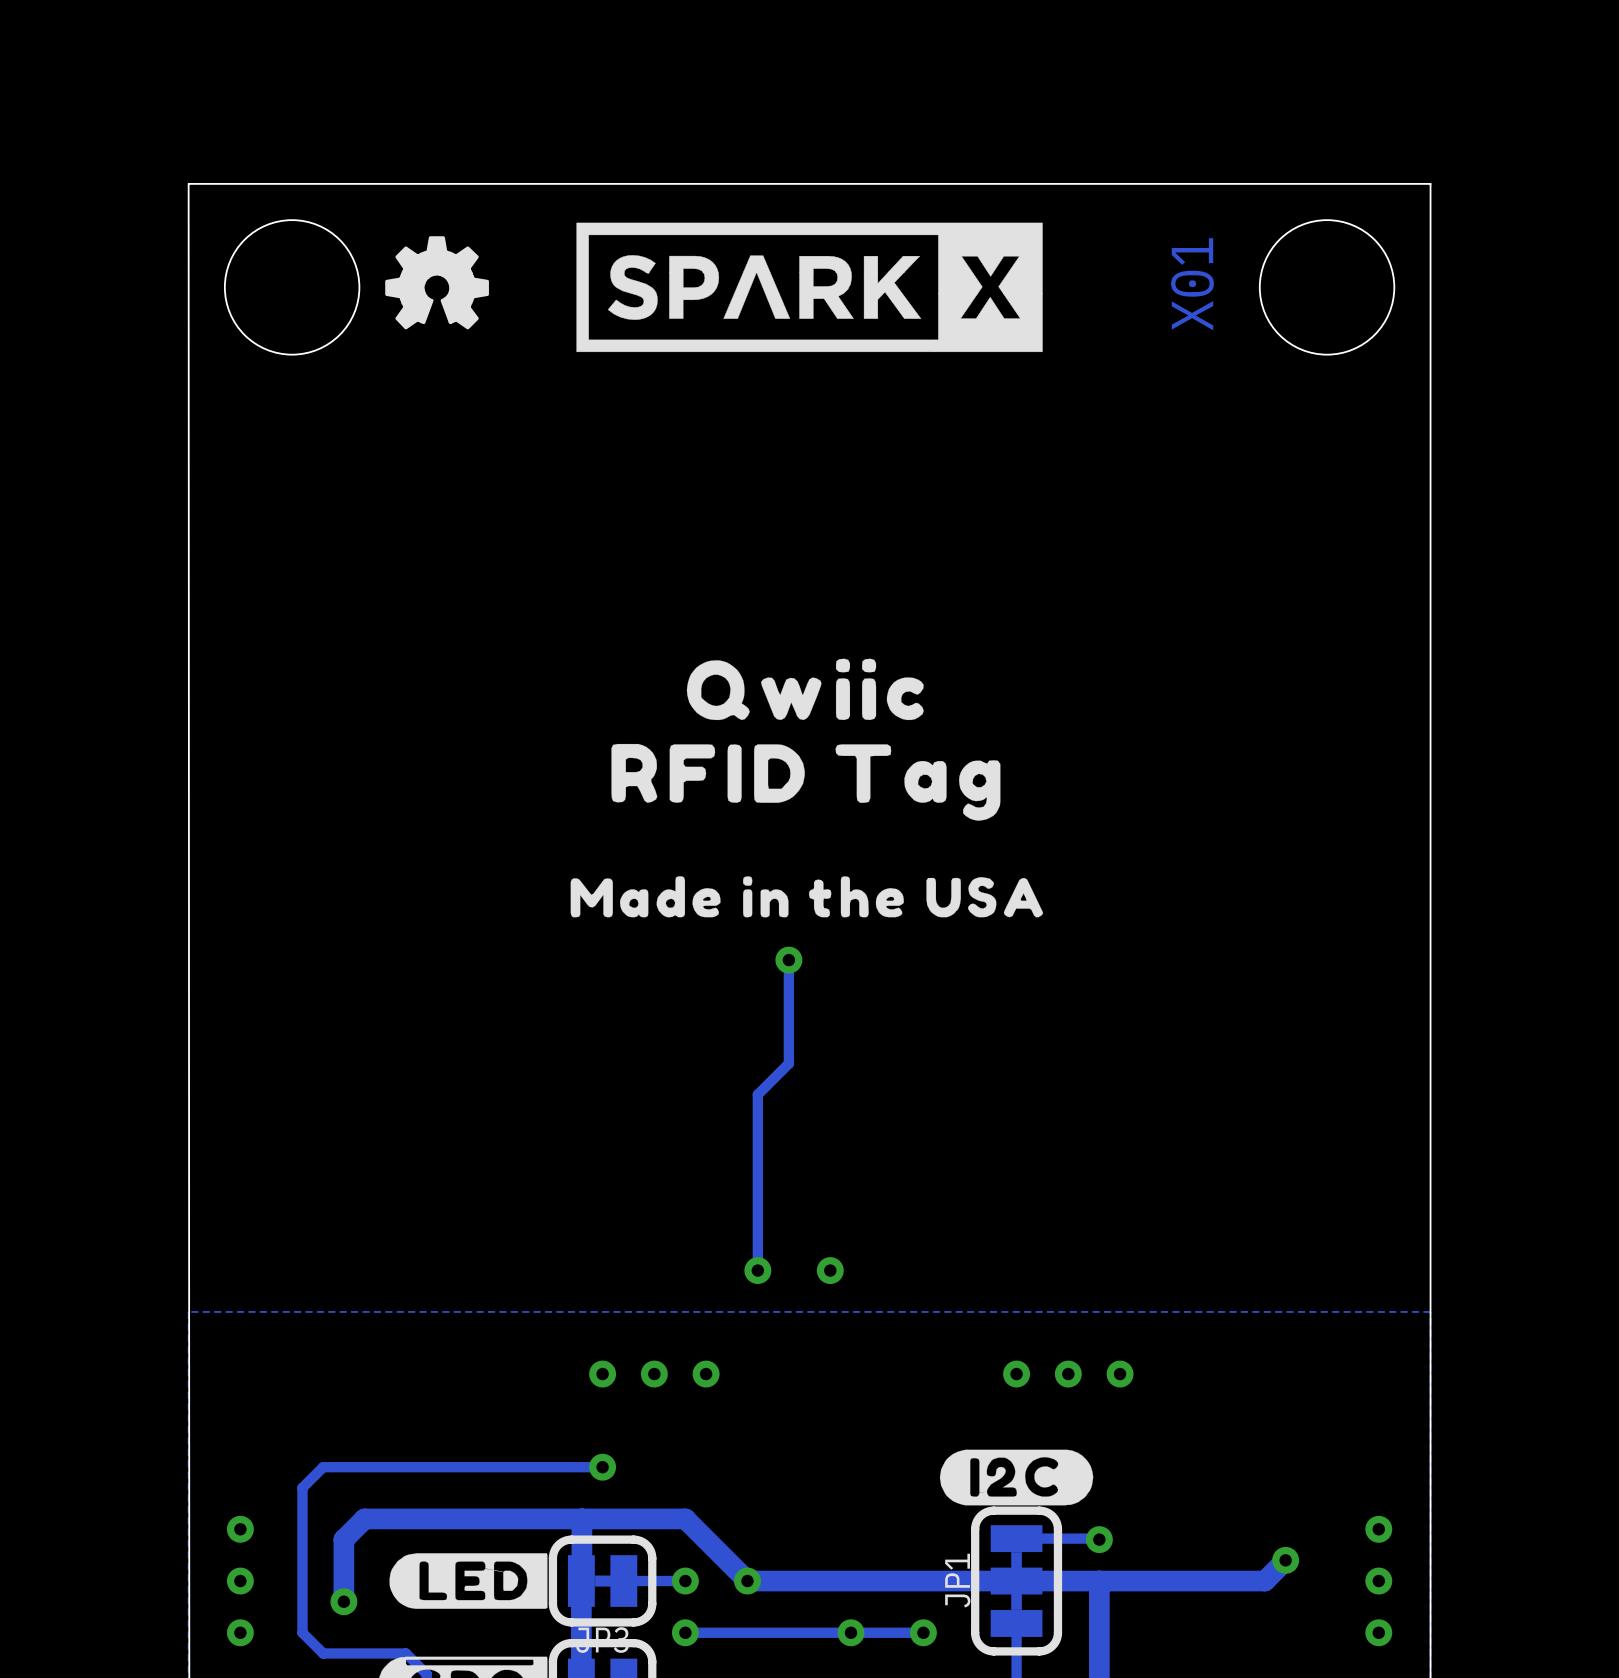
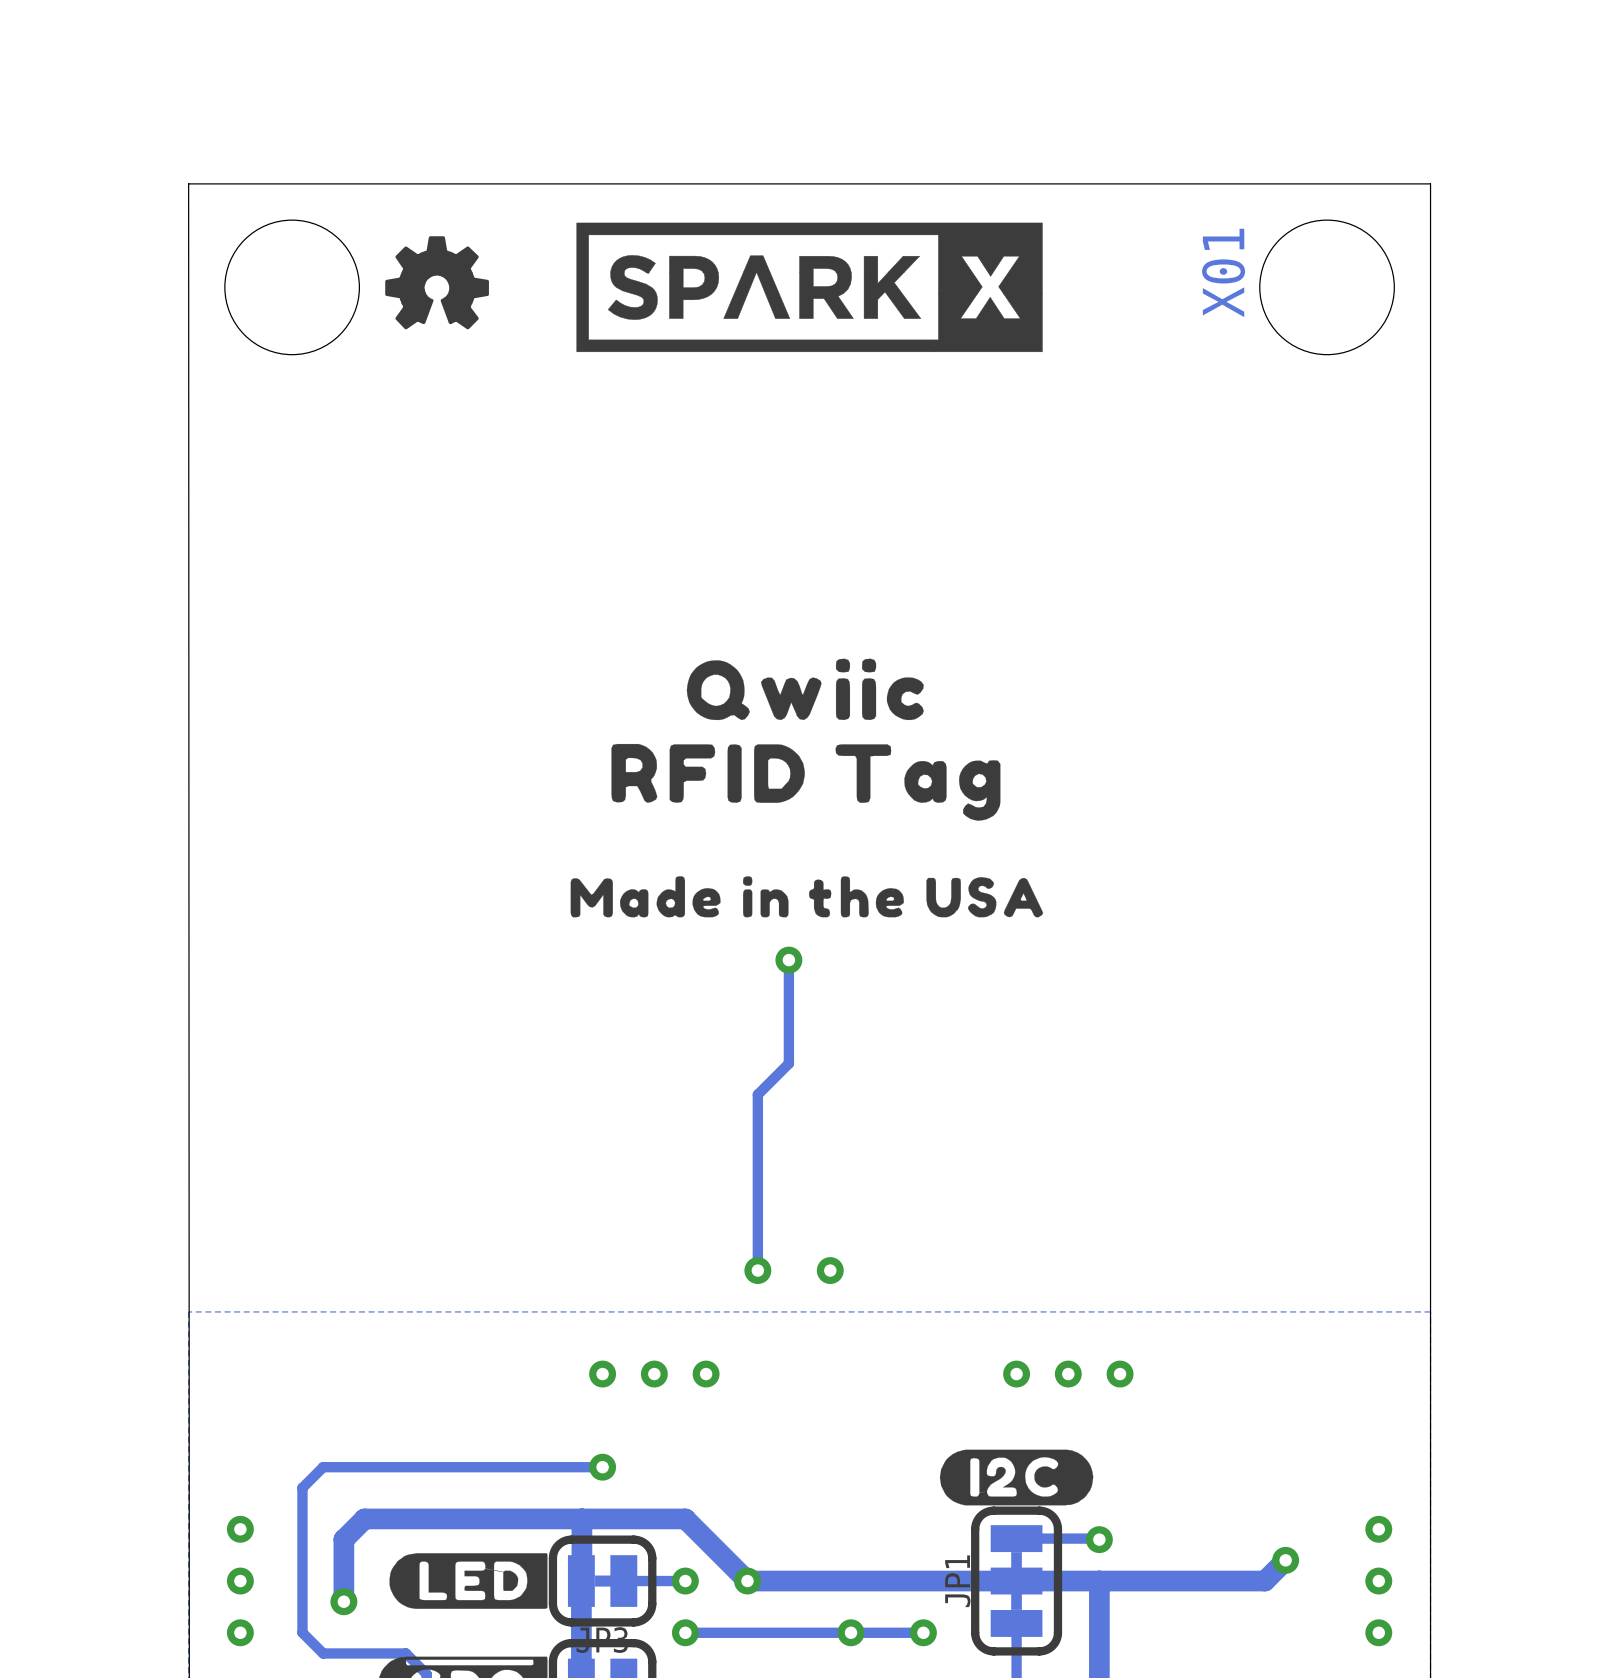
text position: X01 (1192, 284) -> X01 (1223, 272)

